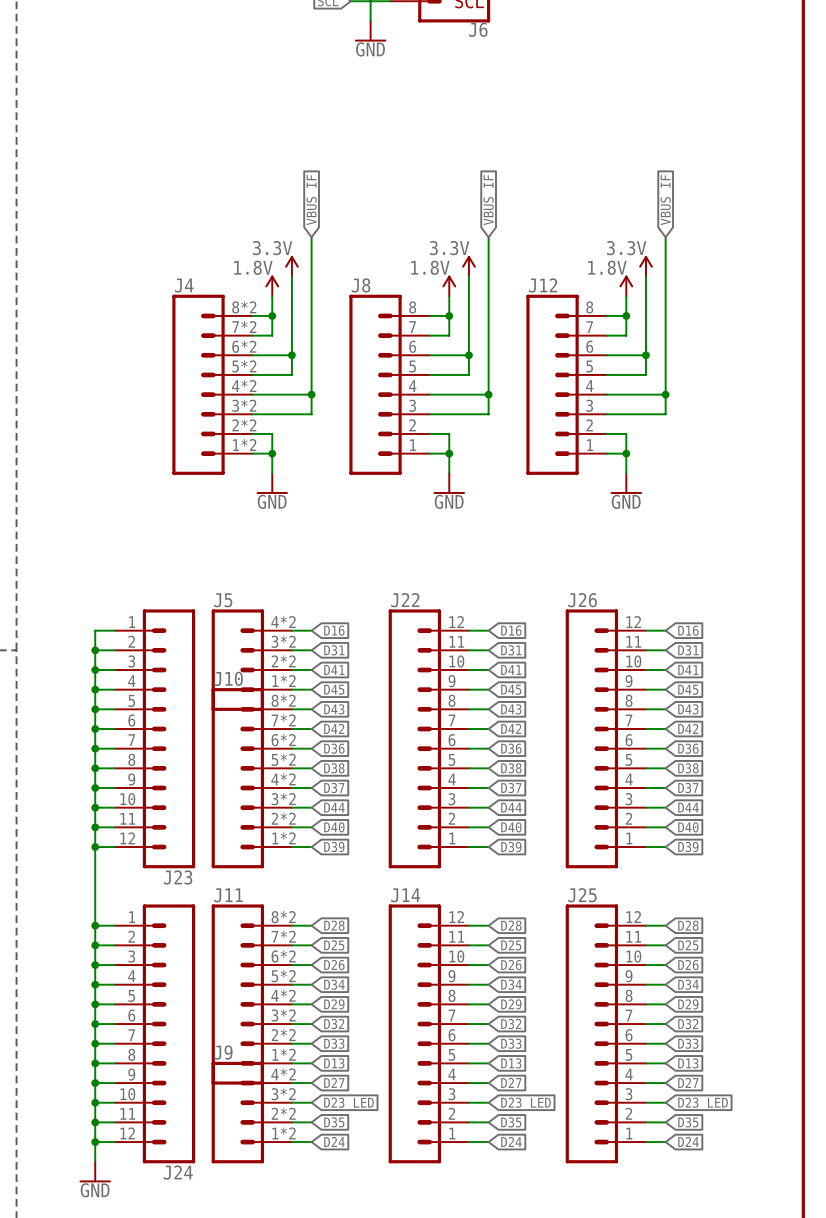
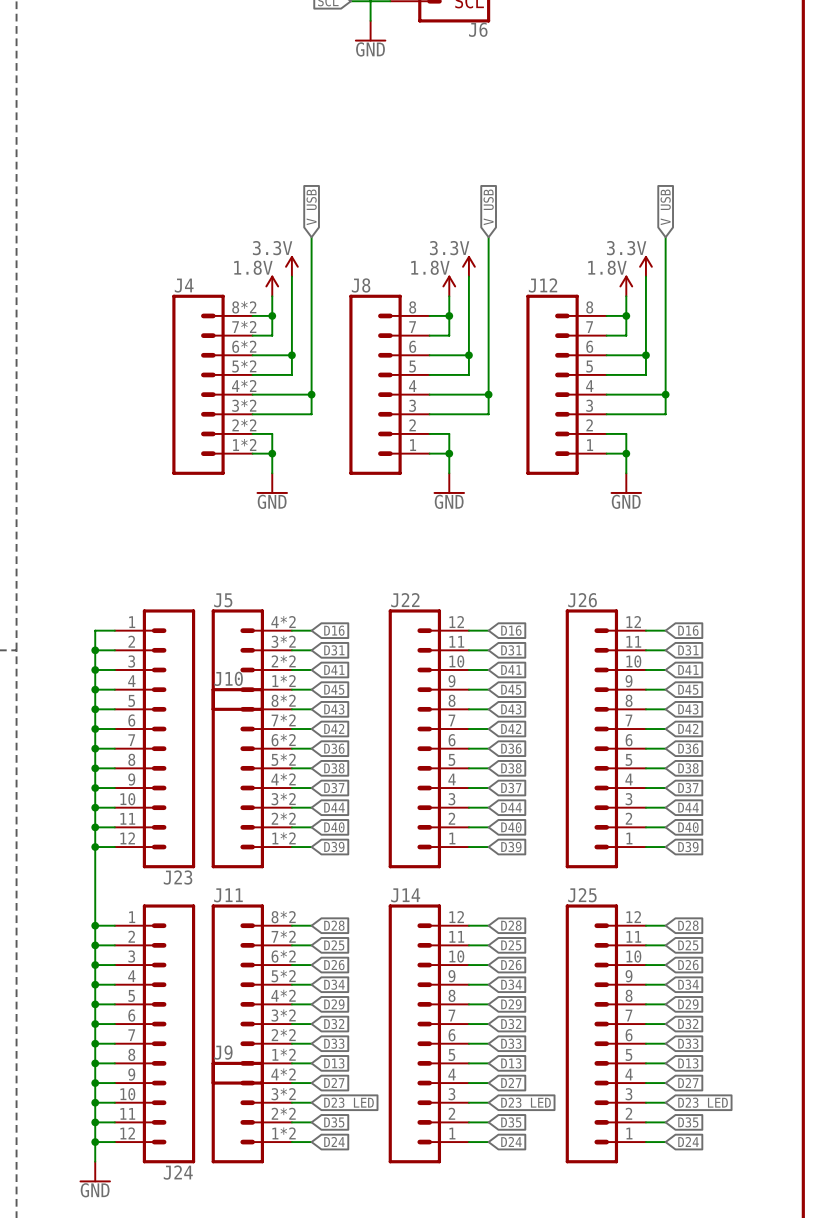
global label: VBUS_IF (313, 200) -> V_USB (313, 207)
global label: VBUS_IF (490, 200) -> V_USB (490, 207)
global label: VBUS_IF (667, 200) -> V_USB (667, 207)

